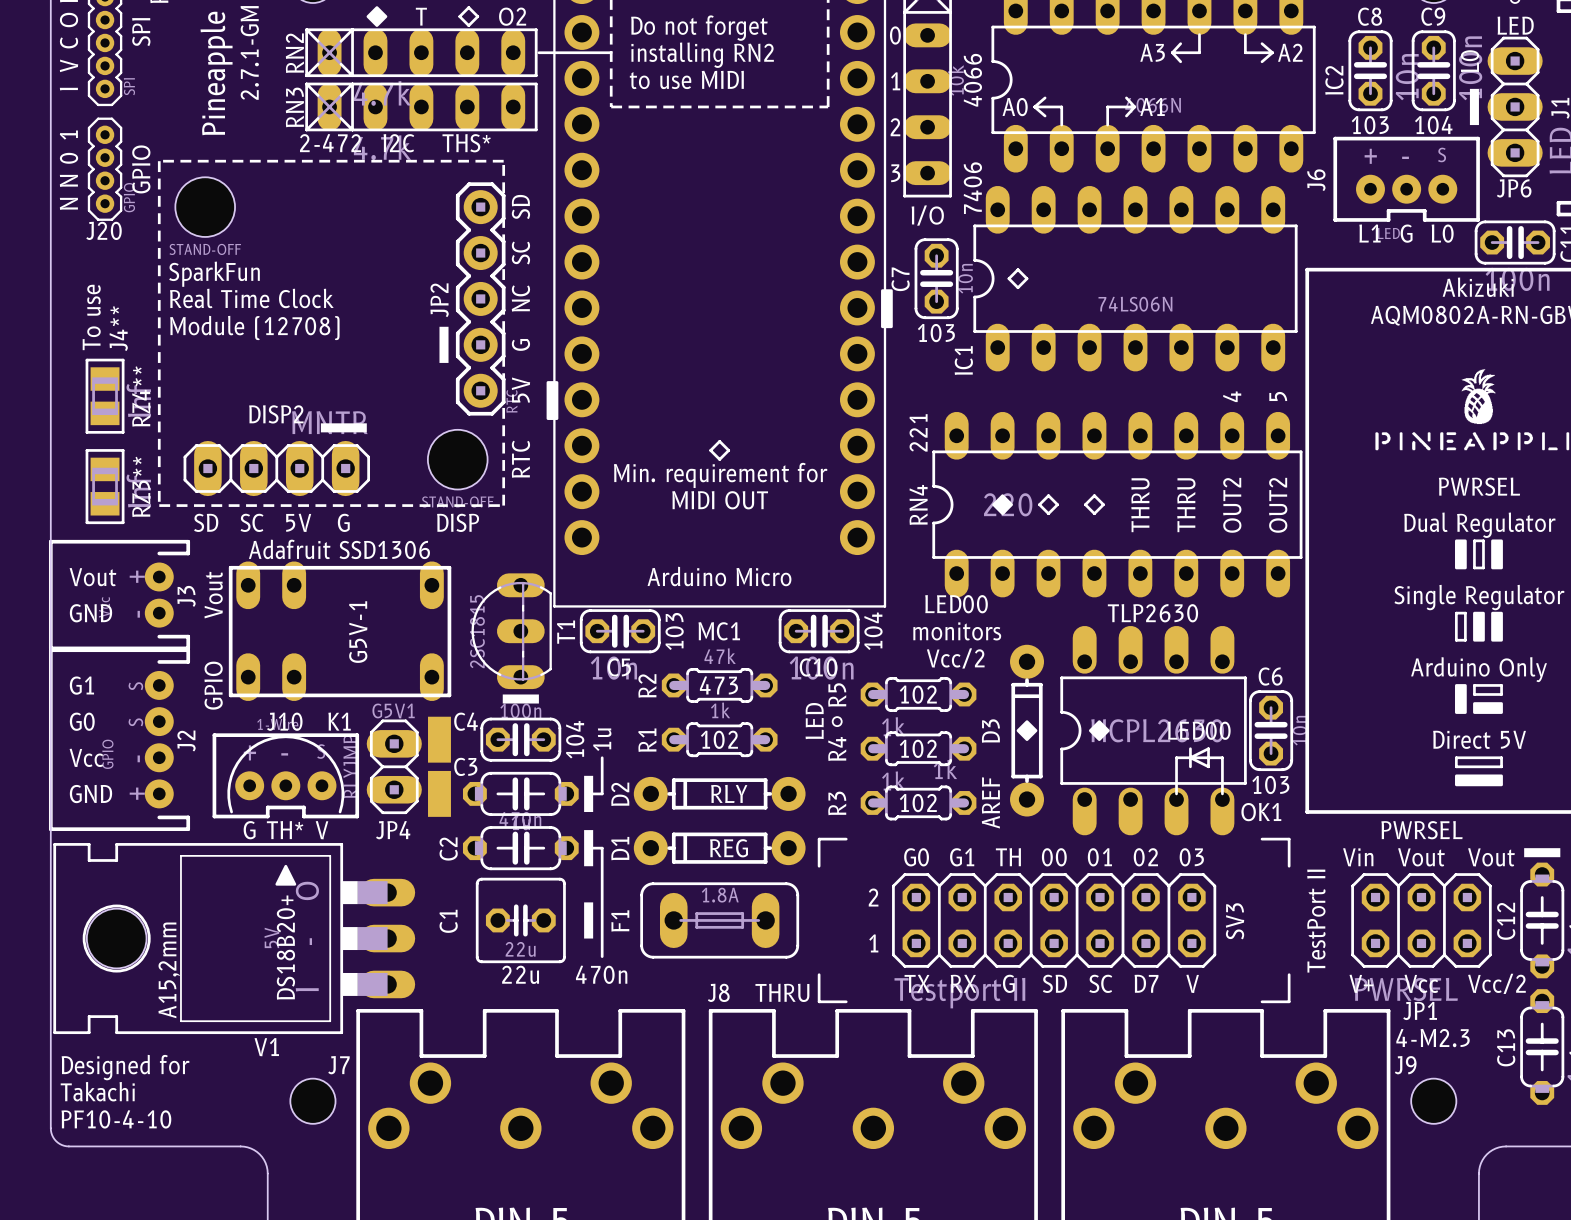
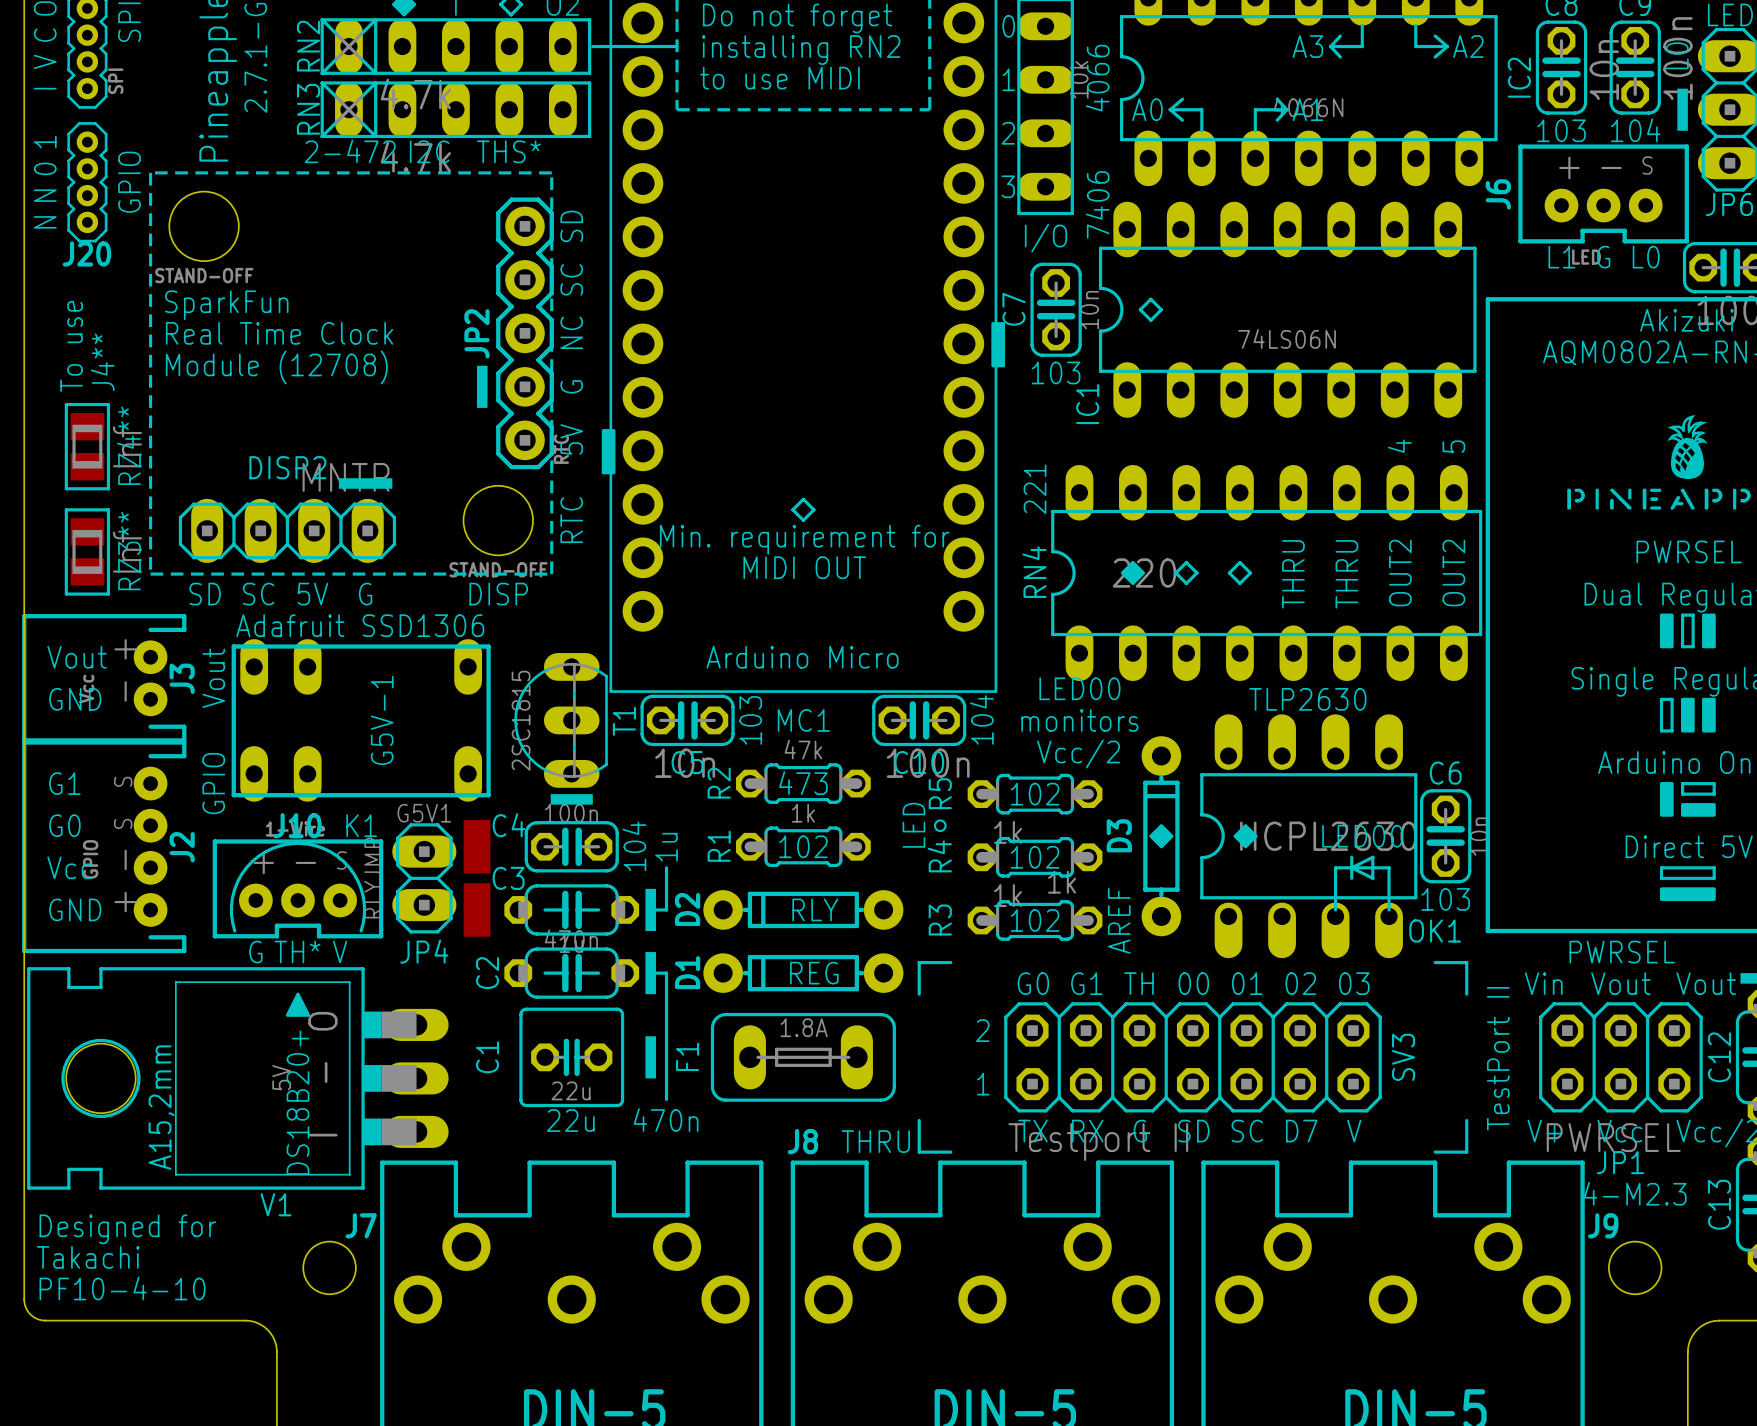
J20 value: GPIO (129, 197) -> none

